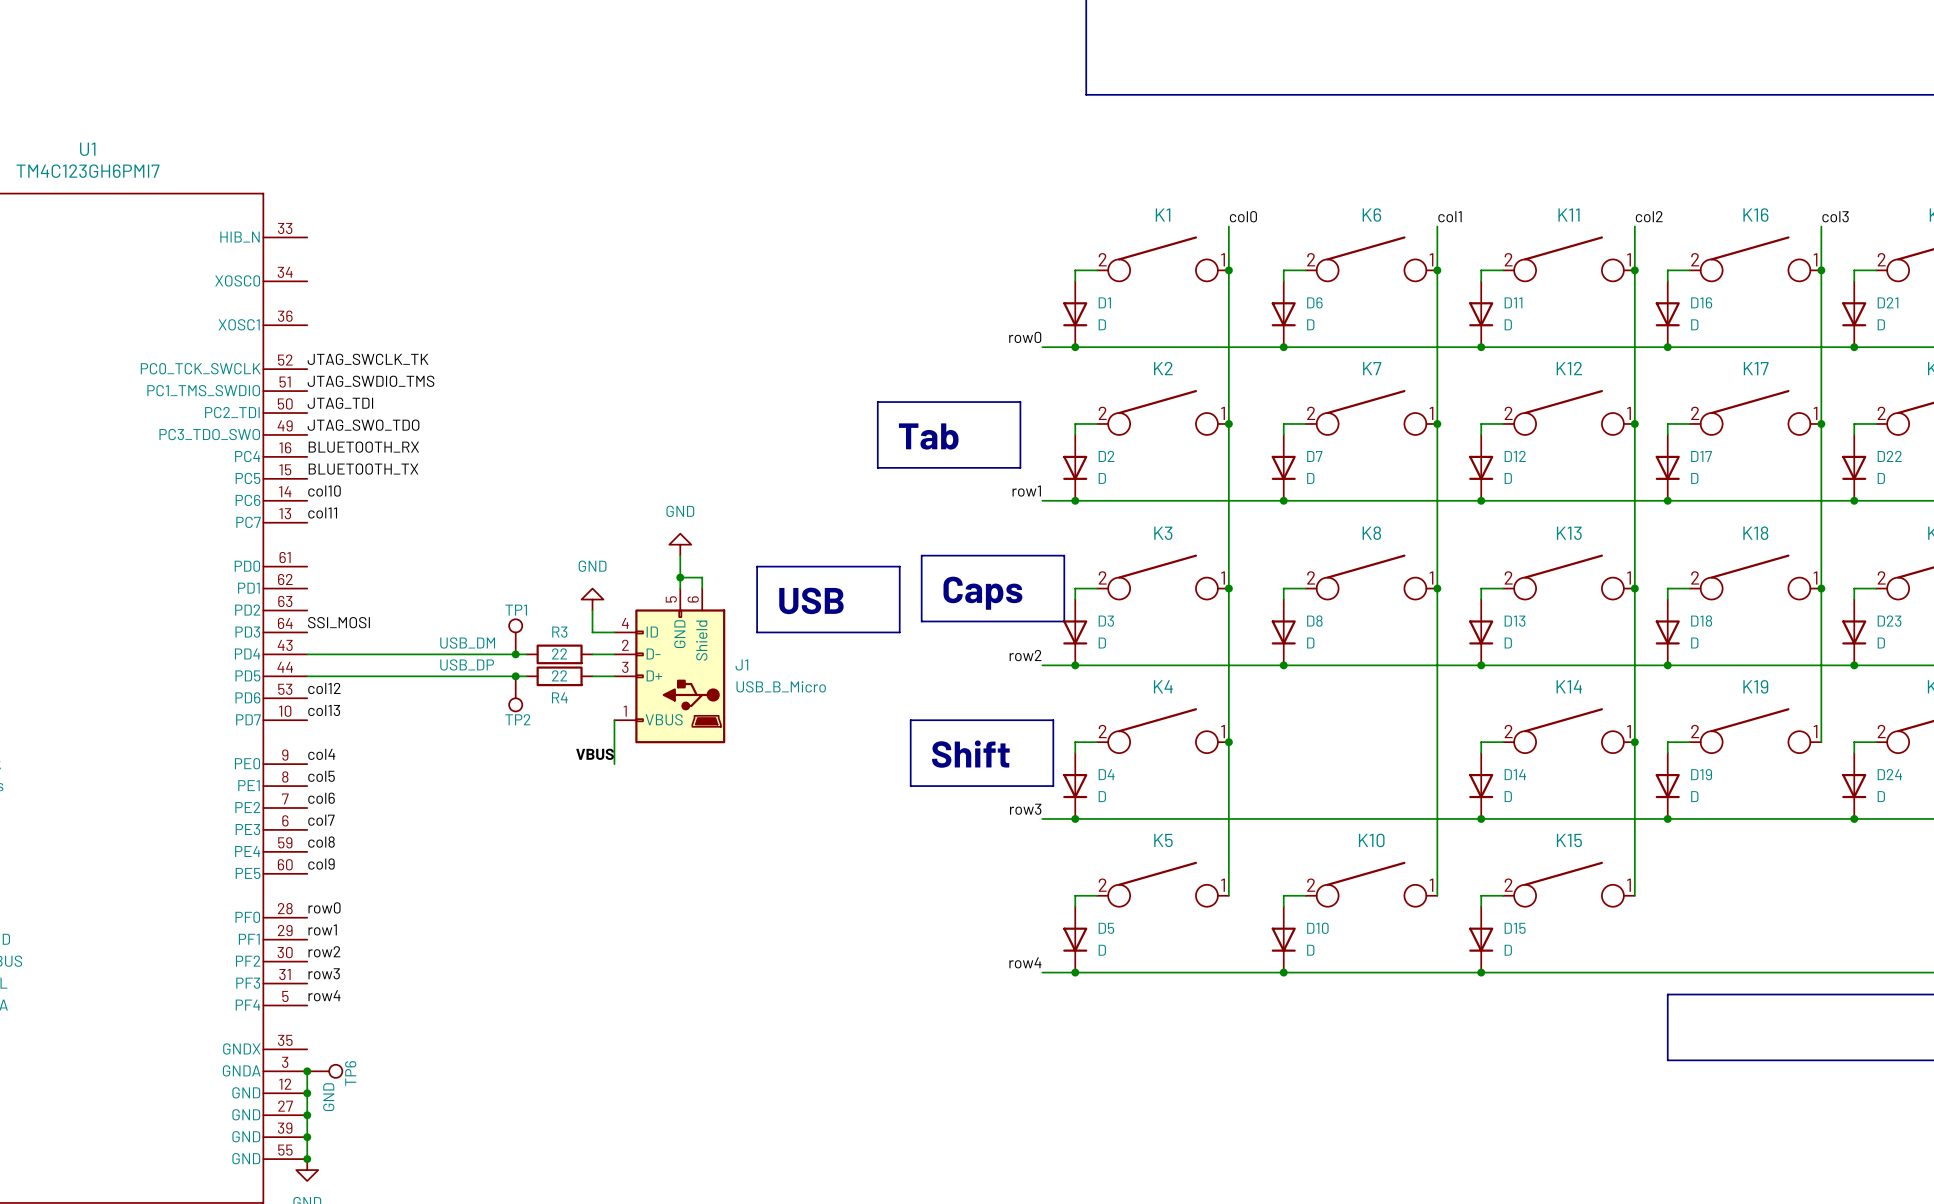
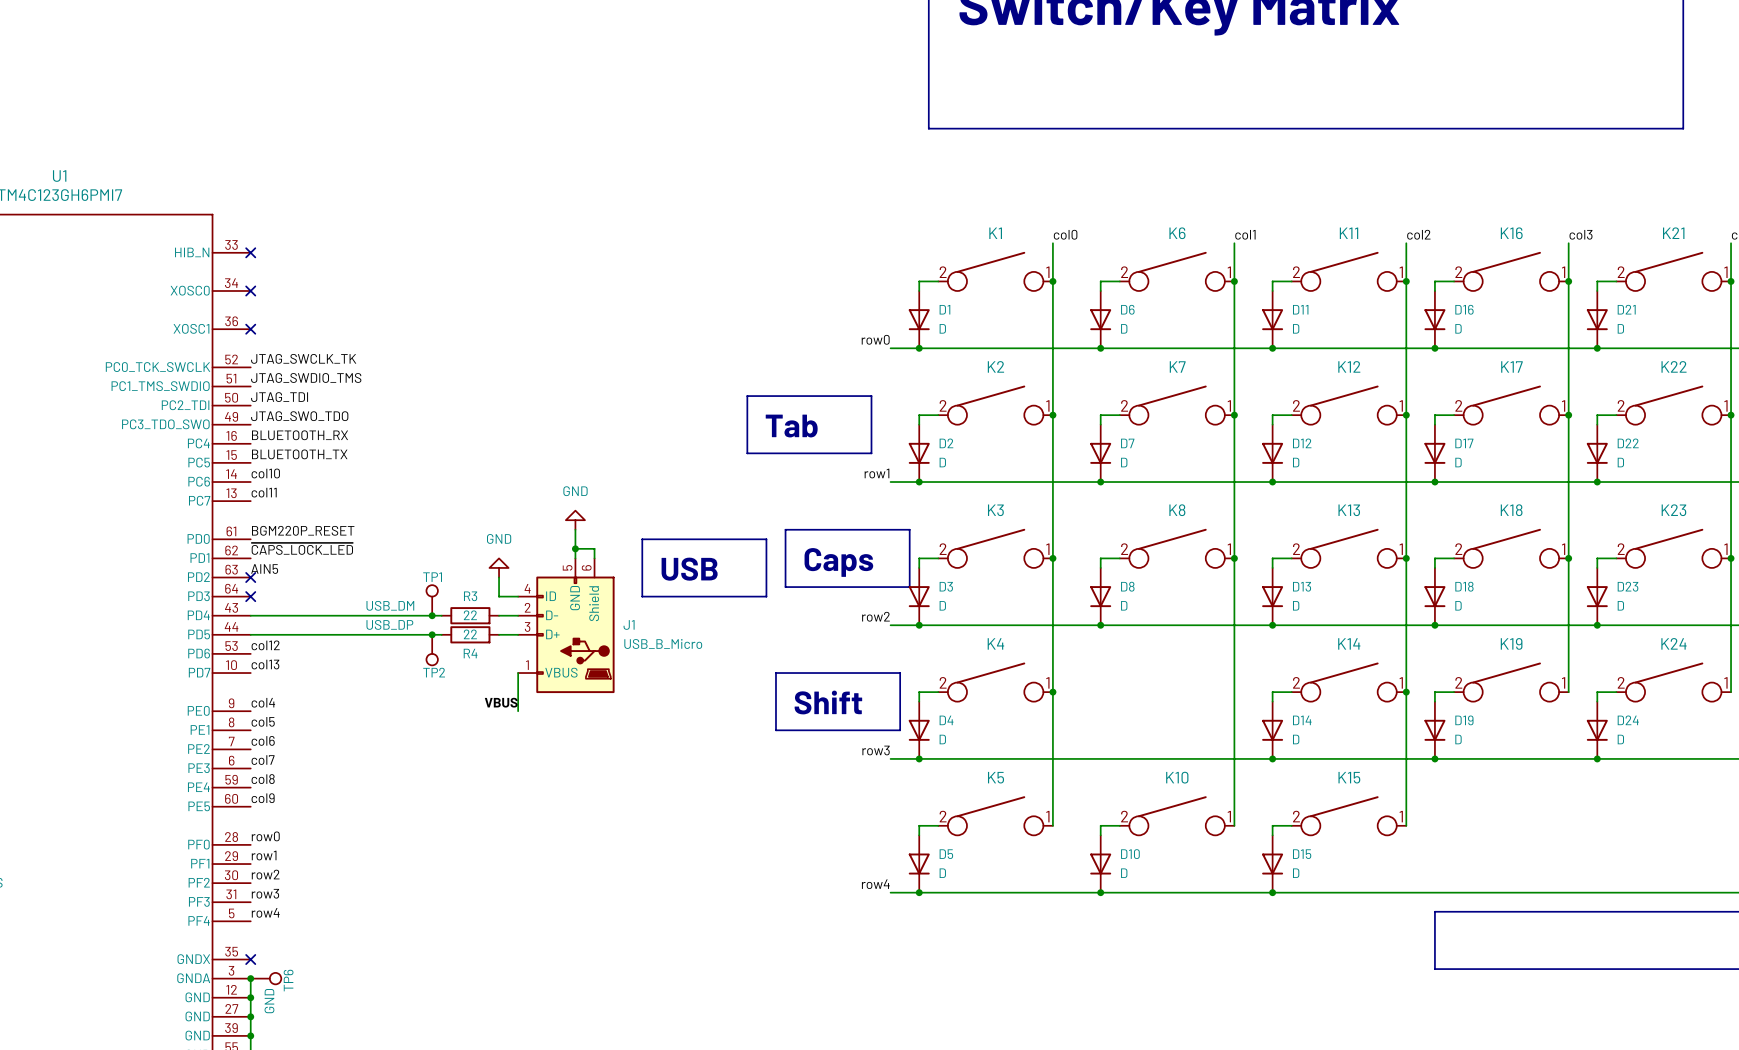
no-connect mark: none -> (250, 252)
no-connect mark: none -> (250, 291)
no-connect mark: none -> (250, 329)
label: none -> BGM220P_RESET (303, 530)
label: none -> ~{CAPS_LOCK_LED} (302, 548)
label: none -> AIN5 (264, 569)
no-connect mark: none -> (250, 577)
label: SSI_MOSI (338, 622) -> none
no-connect mark: none -> (250, 596)
no-connect mark: none -> (250, 959)

